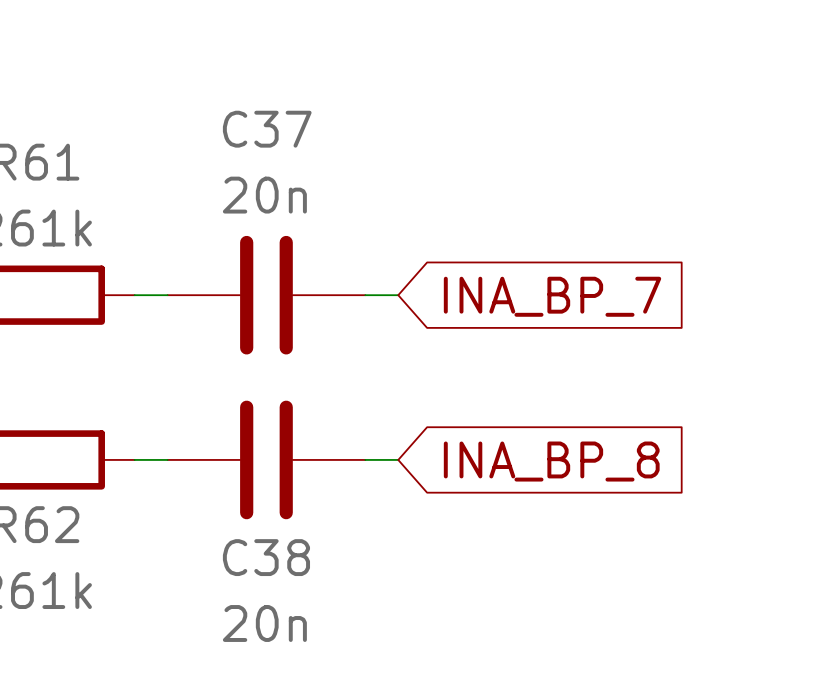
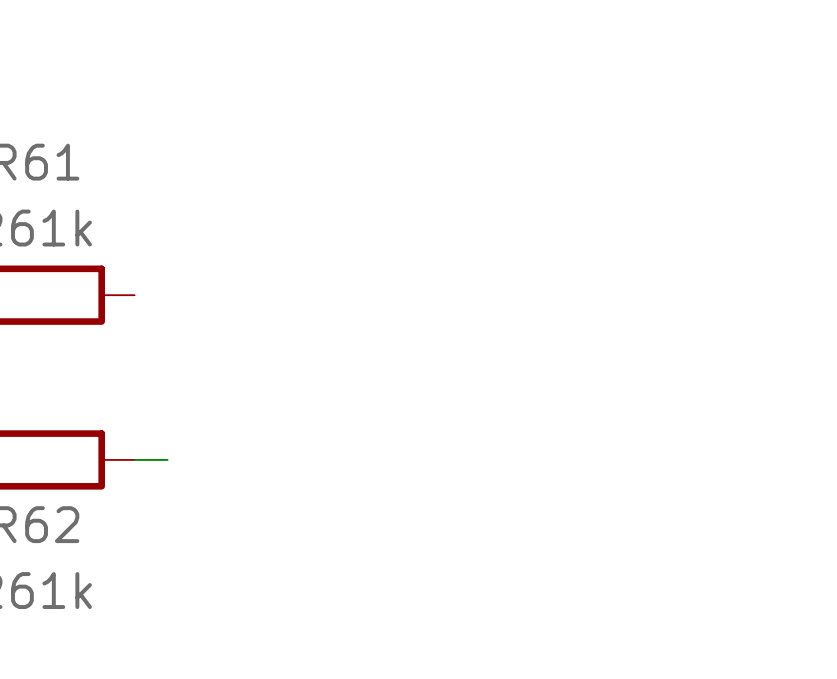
wire: (134, 295) (167, 295) -> none
C37: 20n (266, 295) -> none
wire: (365, 295) (398, 295) -> none
global label: INA_BP_7 (552, 296) -> none
C38: 20n (266, 459) -> none
wire: (365, 459) (398, 459) -> none
global label: INA_BP_8 (551, 461) -> none

